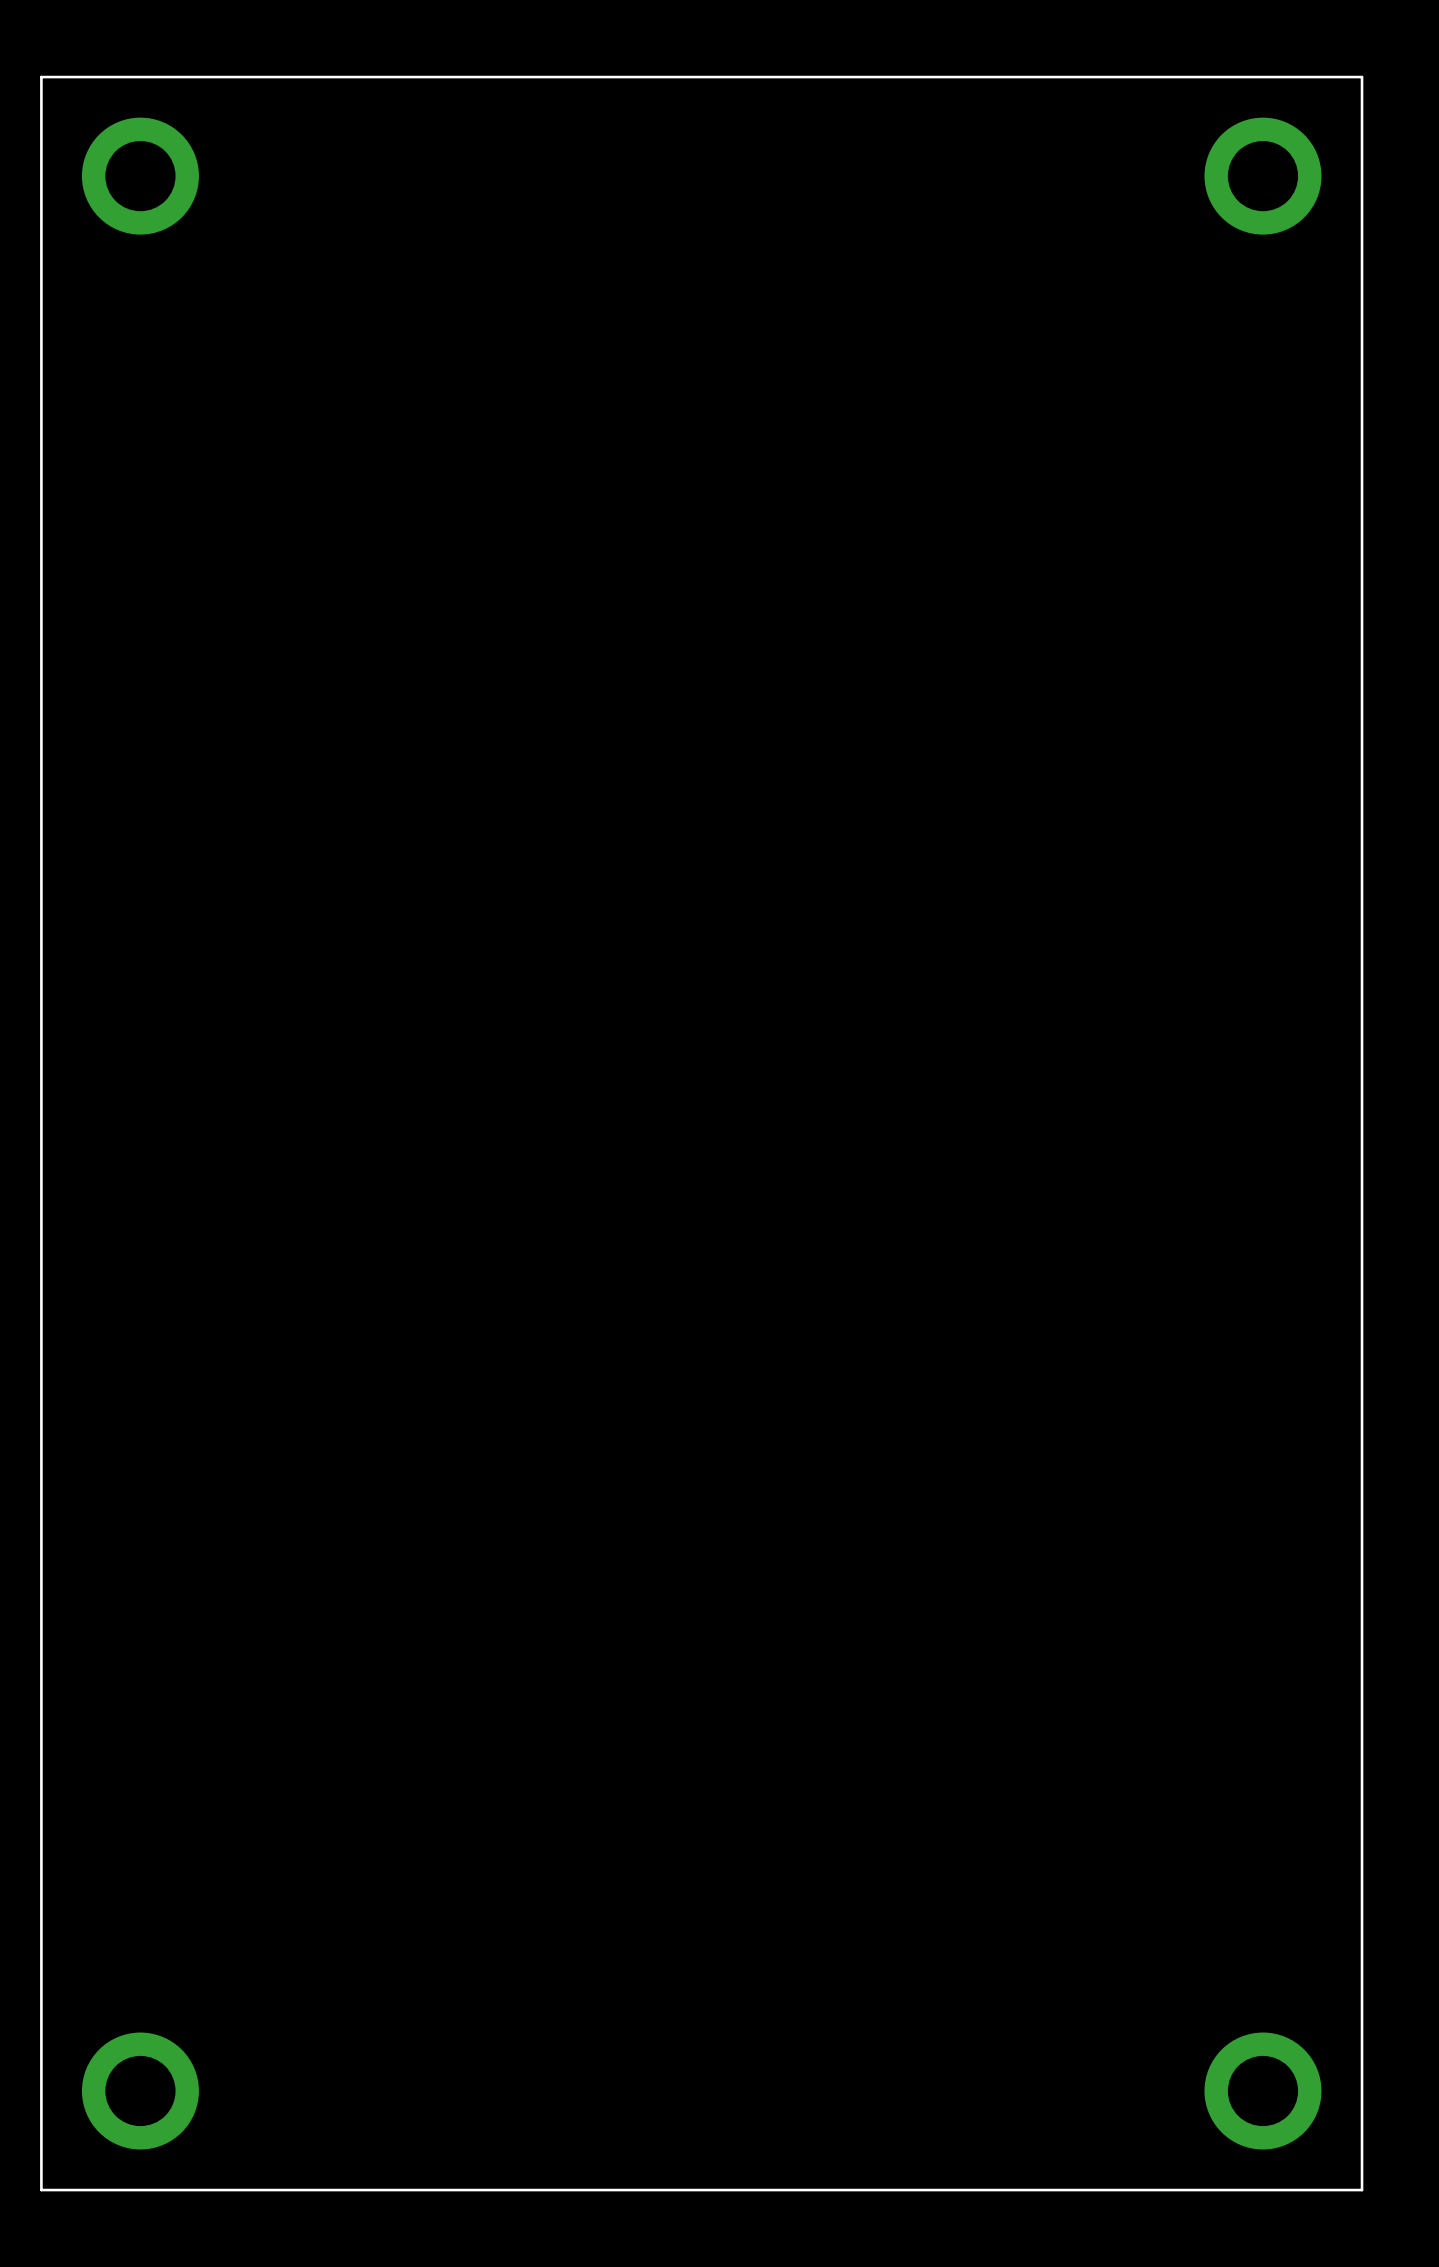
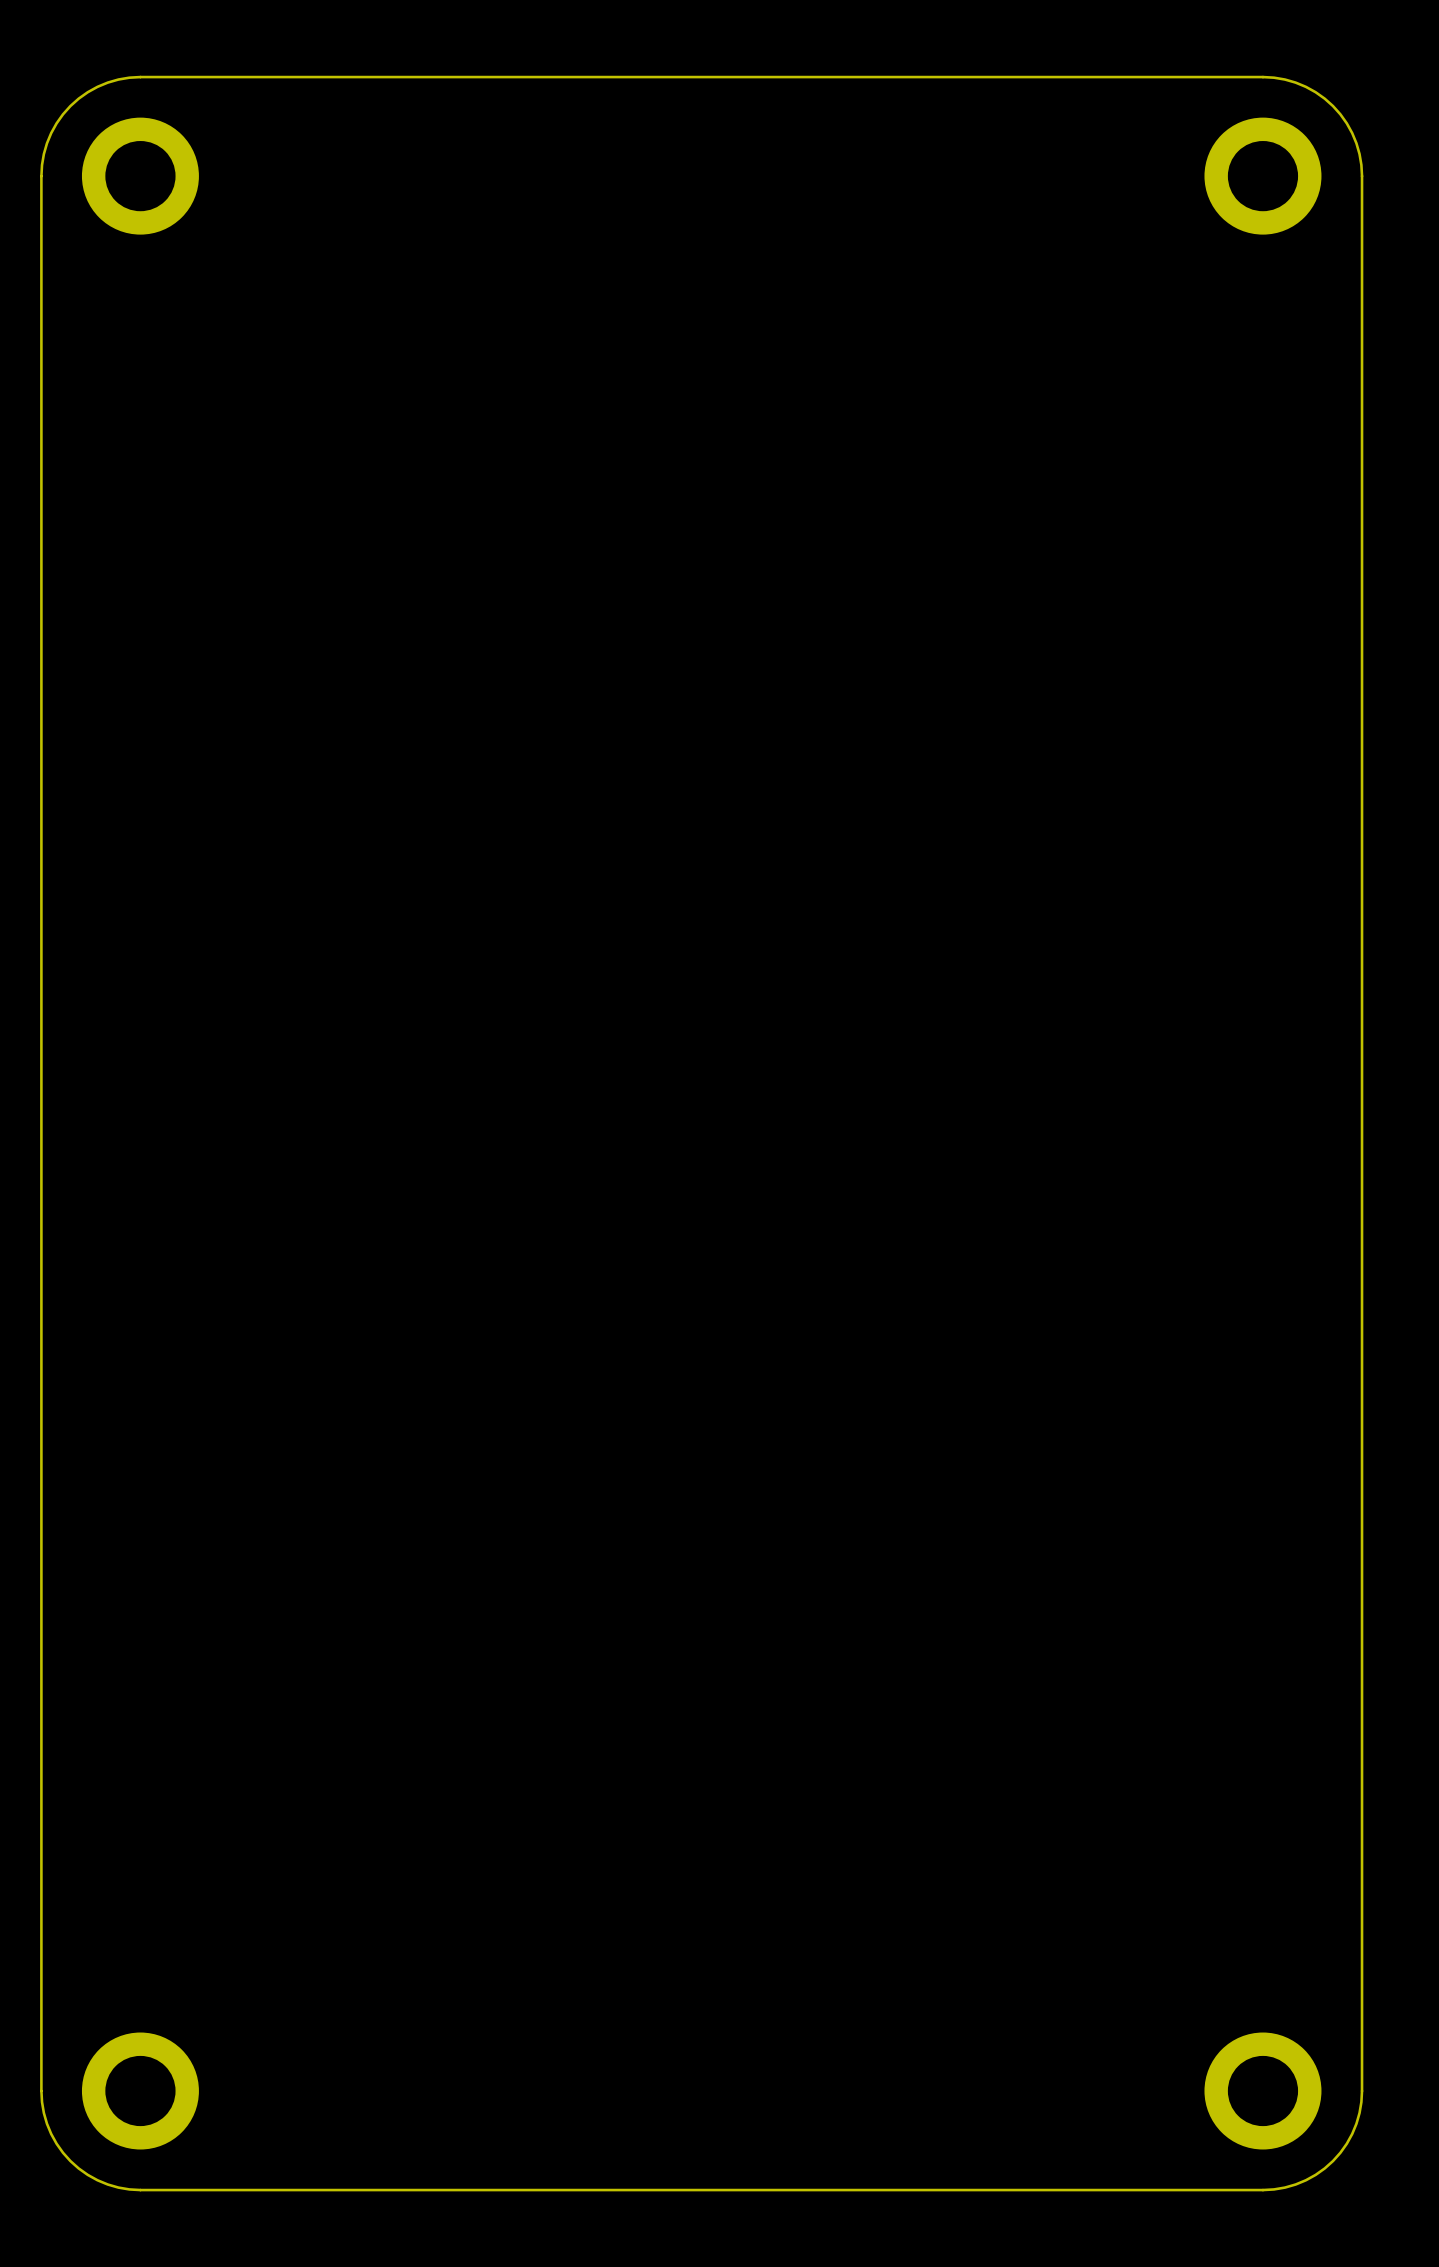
board edge: (140, 77) (41, 77) (41, 176) -> (140, 77) (107, 82) (87, 92) (70, 106) (56, 123) (46, 143) (41, 176)
board edge: (1262, 77) (1362, 77) (1362, 176) -> (1262, 77) (1295, 82) (1315, 92) (1333, 106) (1352, 133) (1359, 154) (1362, 176)
board edge: (41, 2091) (41, 2190) (140, 2190) -> (41, 2091) (43, 2113) (51, 2133) (70, 2161) (97, 2180) (118, 2187) (140, 2190)
board edge: (1362, 2091) (1362, 2190) (1262, 2190) -> (1362, 2091) (1359, 2113) (1352, 2133) (1333, 2161) (1315, 2174) (1295, 2184) (1262, 2190)

